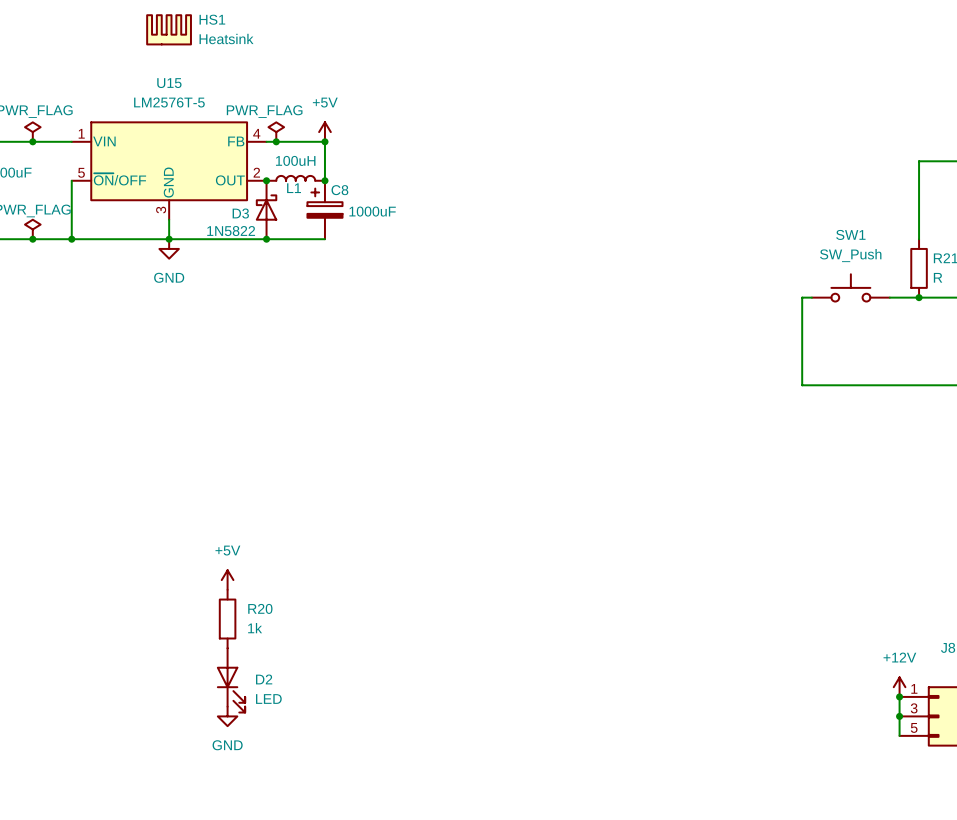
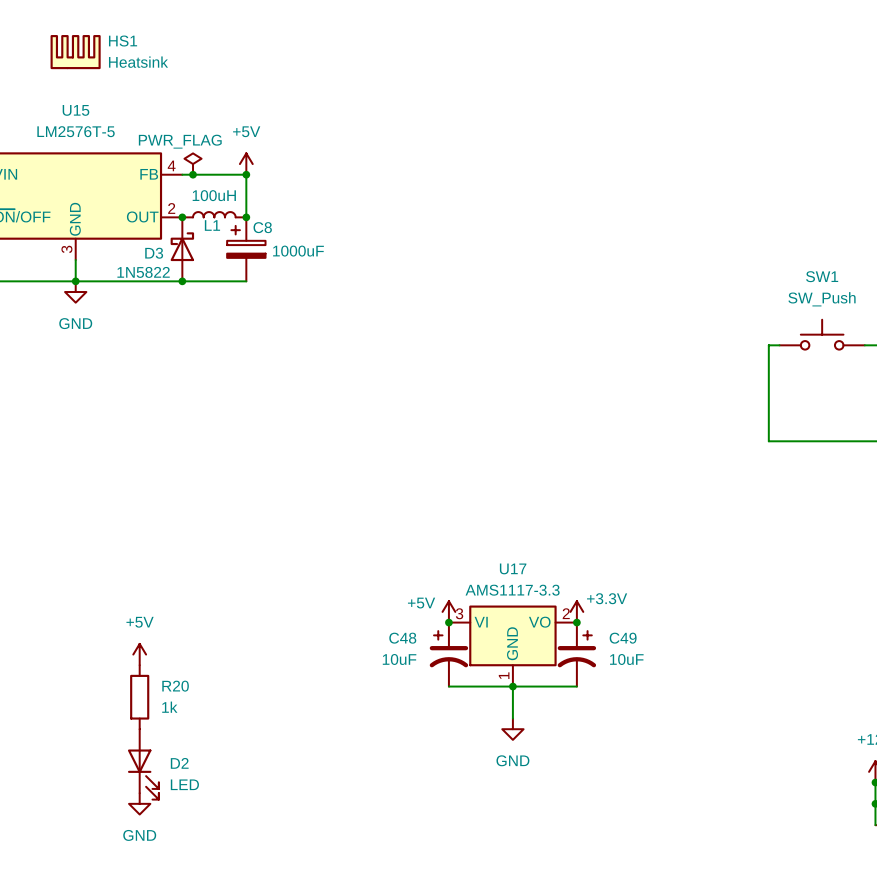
power symbol: none -> +5V (448, 611)
power symbol: none -> +3.3V (576, 611)
junction: none -> (448, 622)
junction: none -> (576, 622)
U17: none -> AMS1117-3.3 (512, 646)
C48: none -> 10uF (448, 654)
C49: none -> 10uF (576, 654)
wire: none -> (448, 686) (576, 686)
wire: none -> (512, 686) (512, 718)
junction: none -> (512, 686)
power symbol: none -> GND (512, 729)

